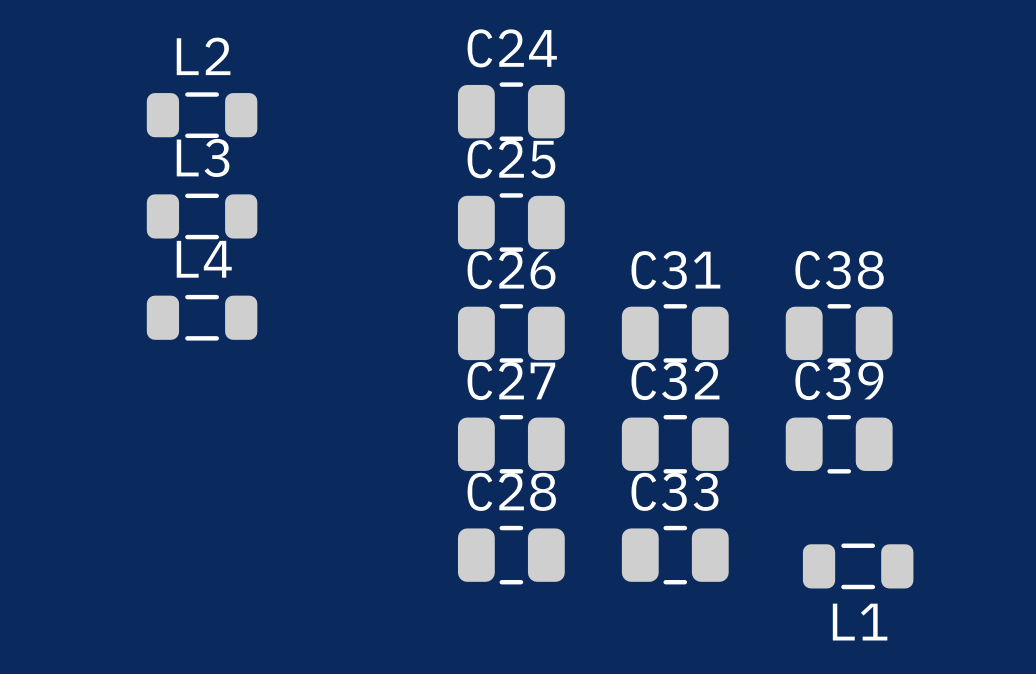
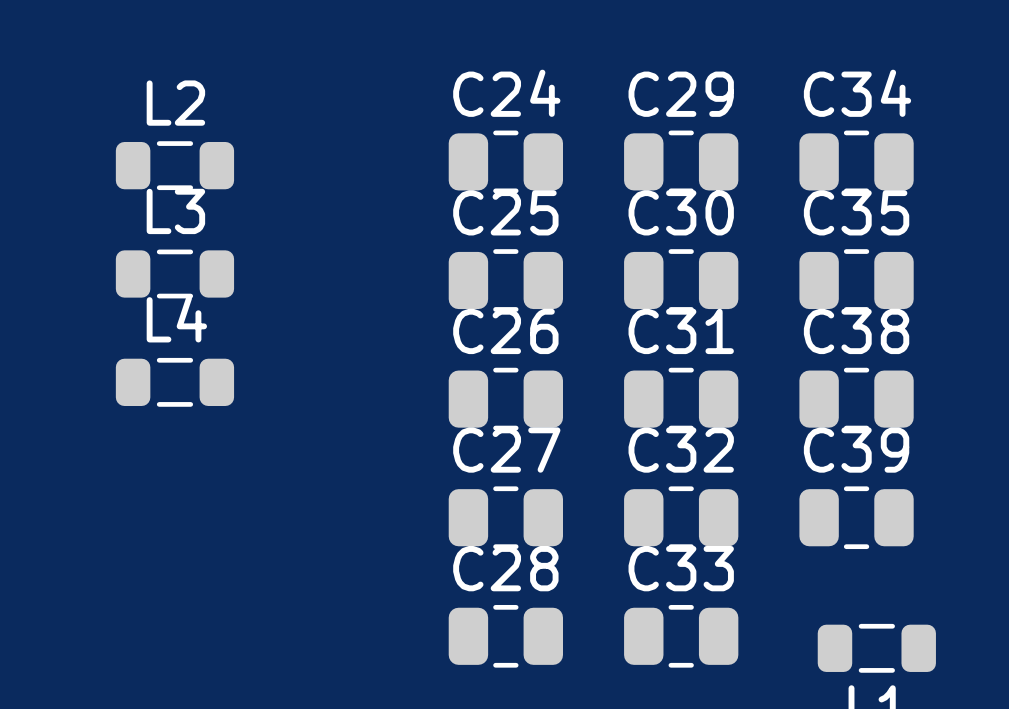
C29: none -> (681, 161)
C34: none -> (856, 161)
C30: none -> (681, 280)
C35: none -> (856, 280)

